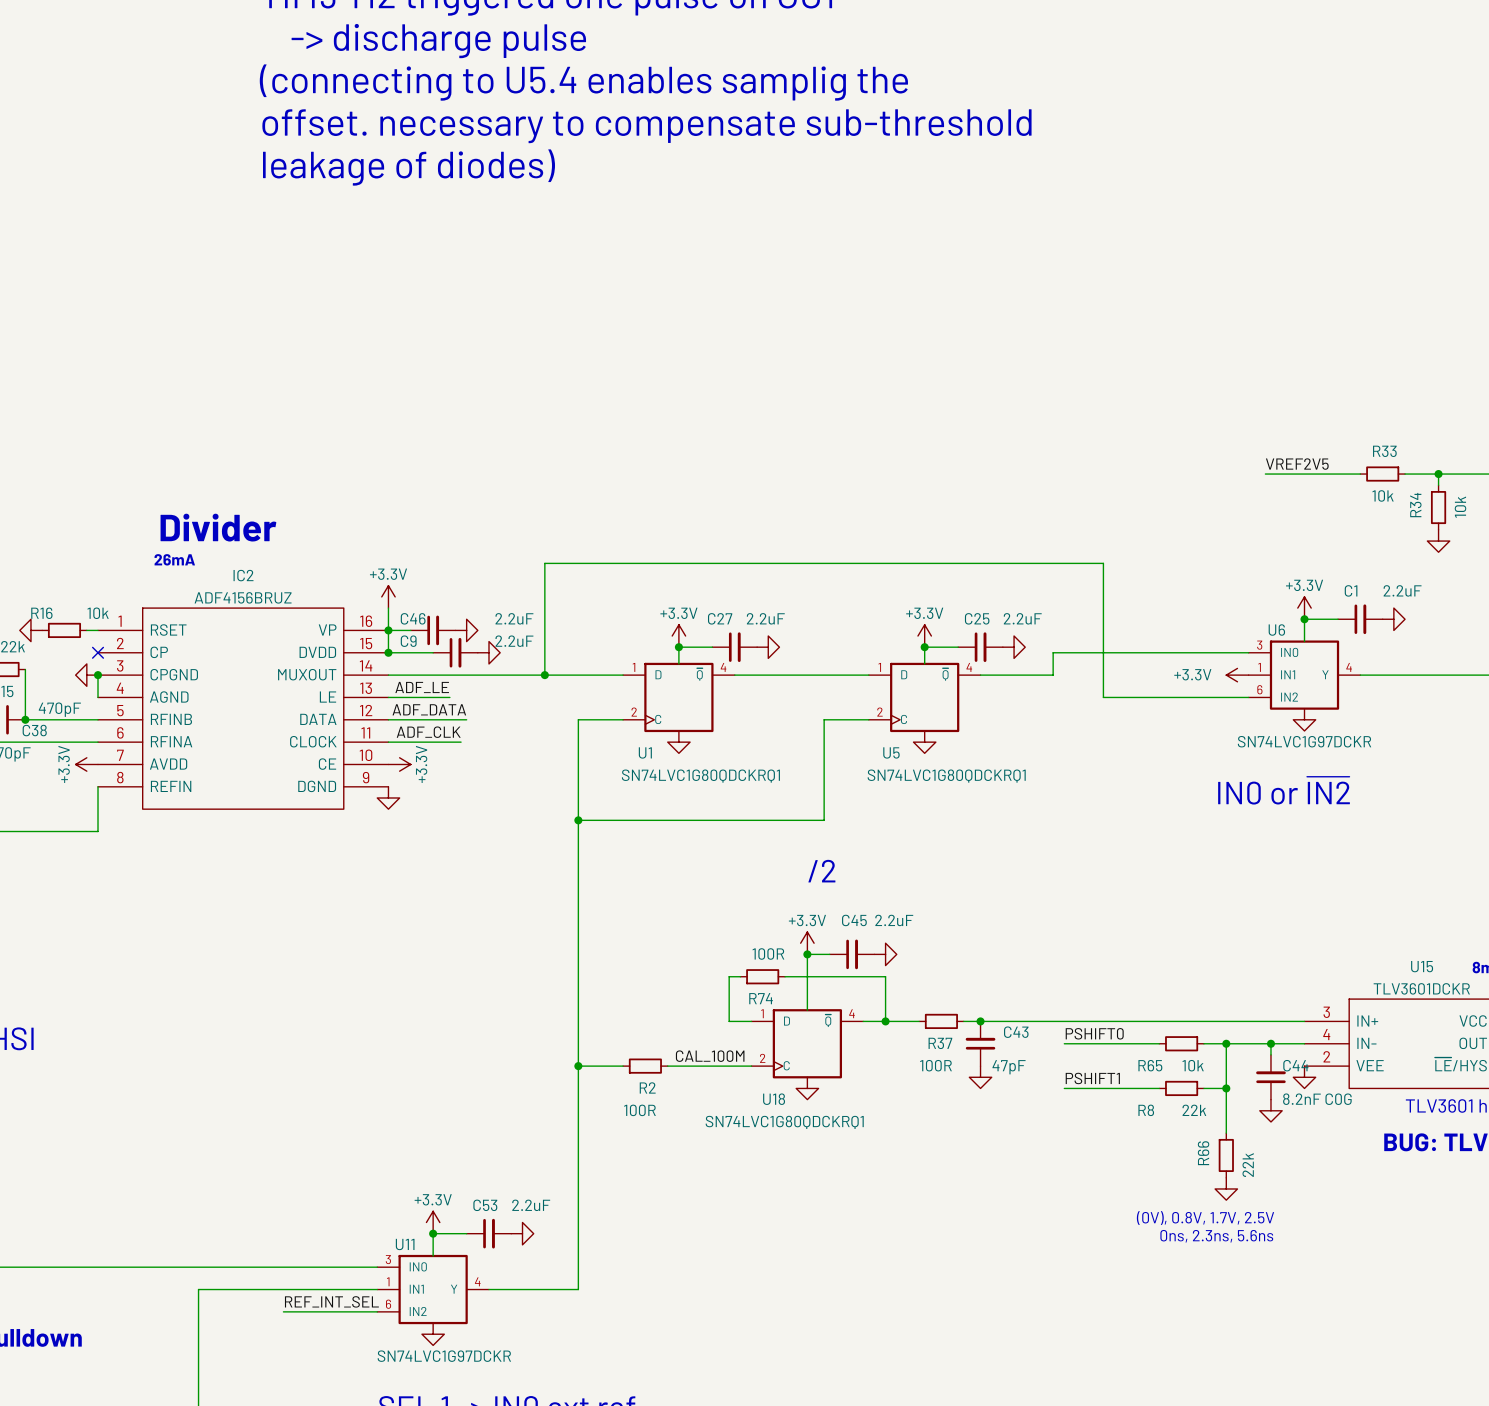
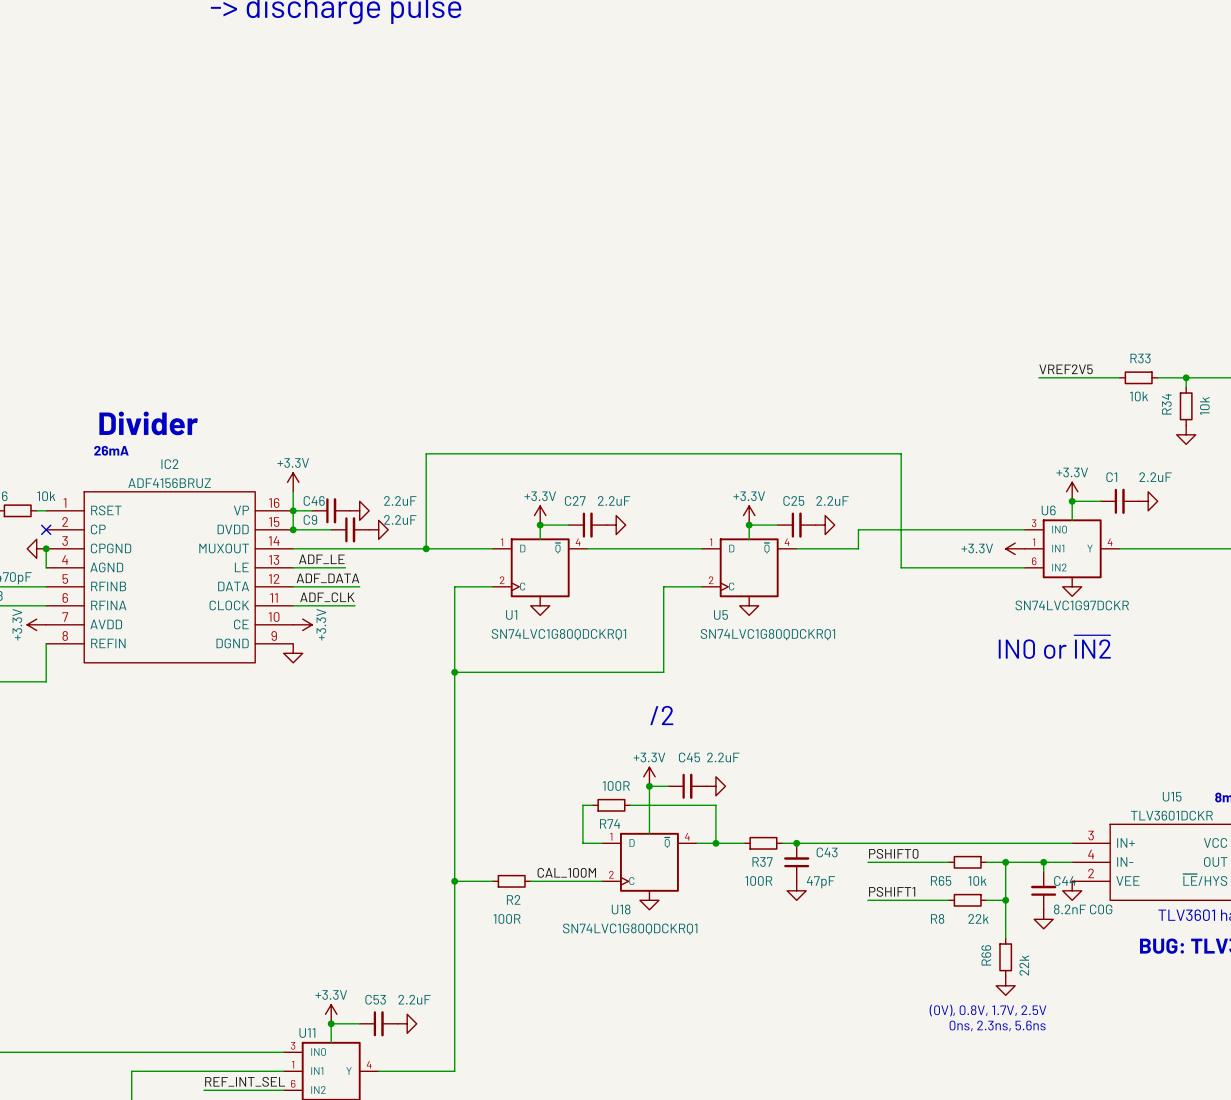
text: (connecting to U5.4 enables samplig the (583, 82) -> none
text: offset. necessary to compensate sub-threshold (646, 126) -> none
text: leakage of diodes) (409, 167) -> none

